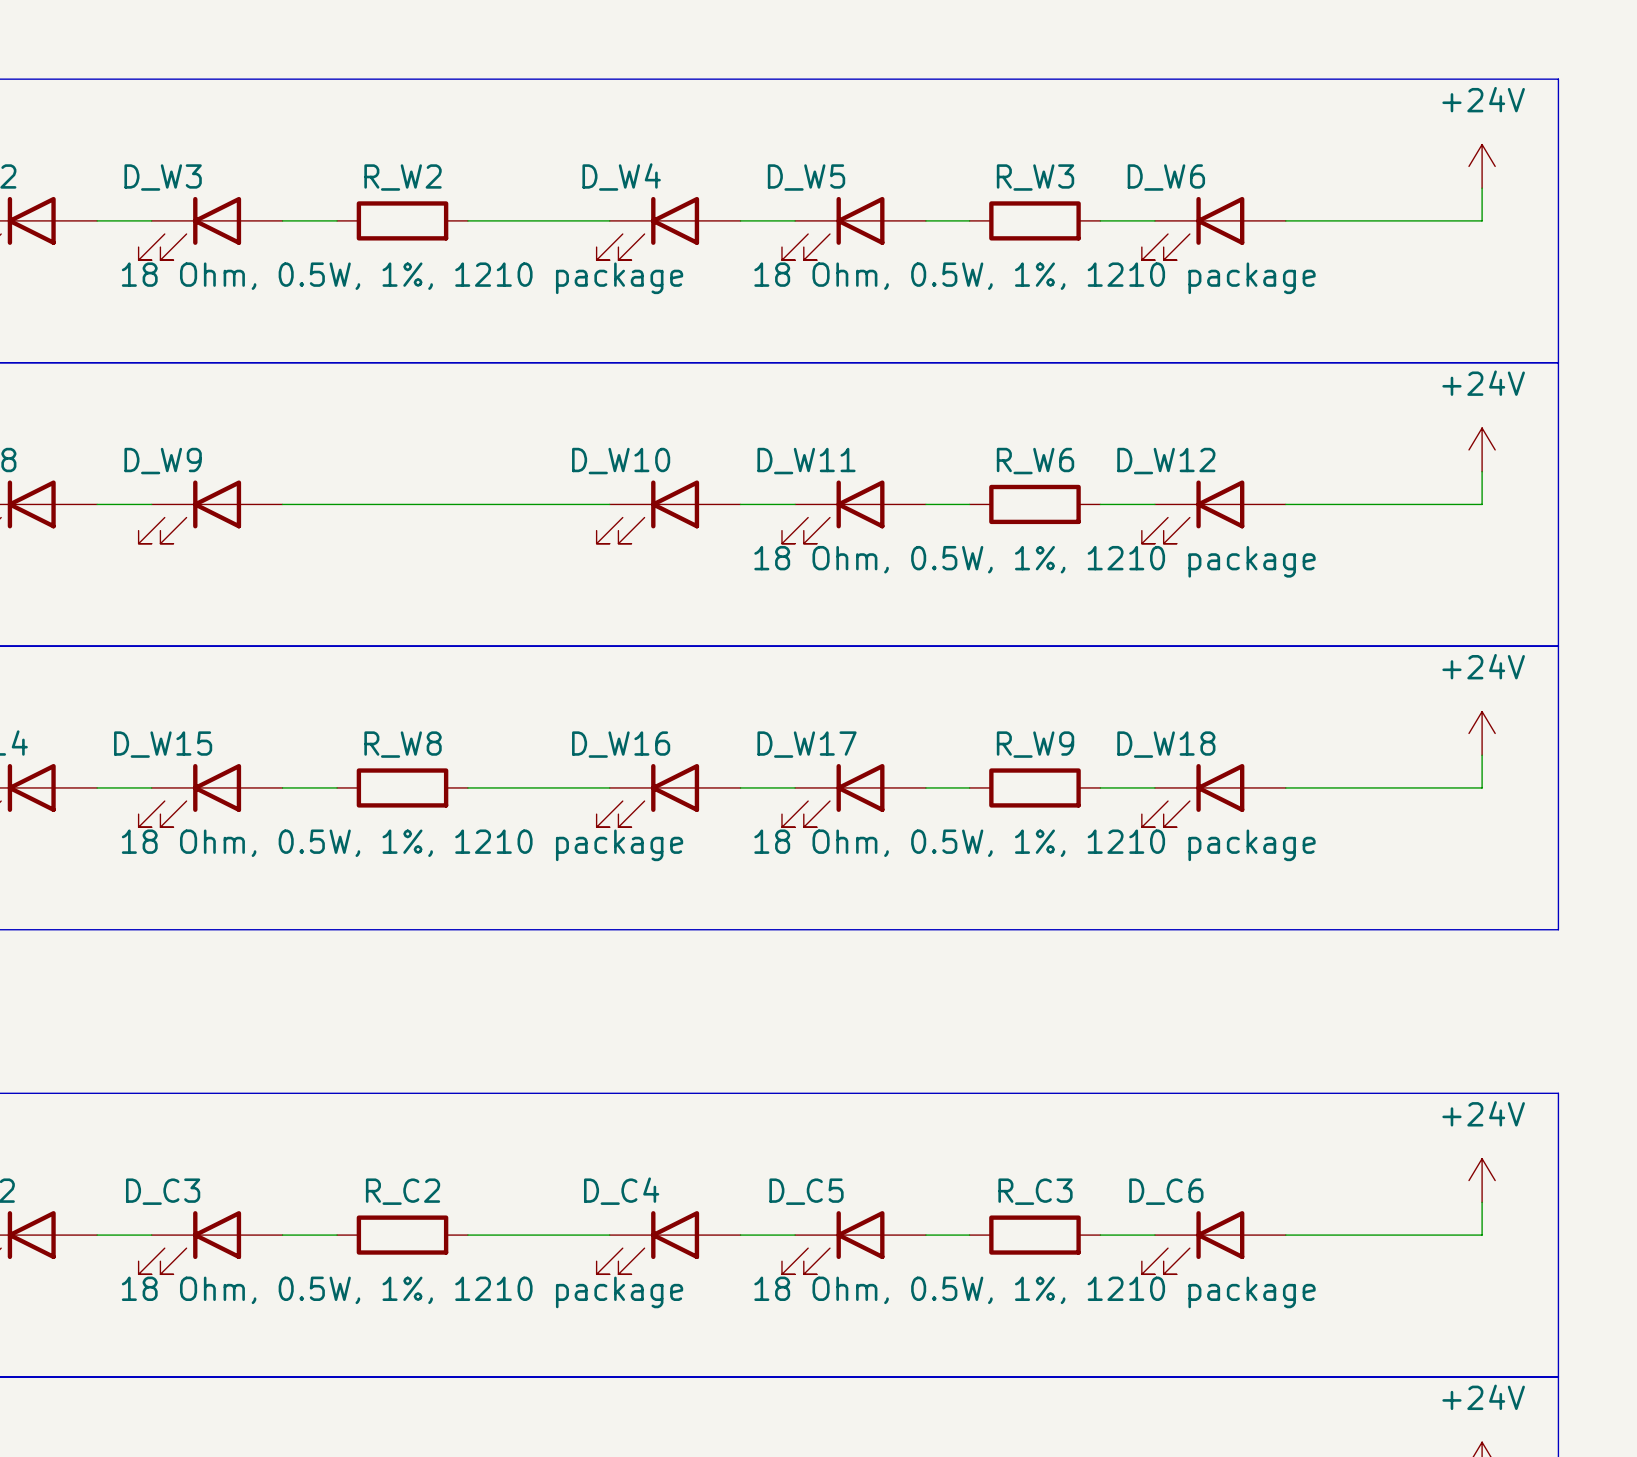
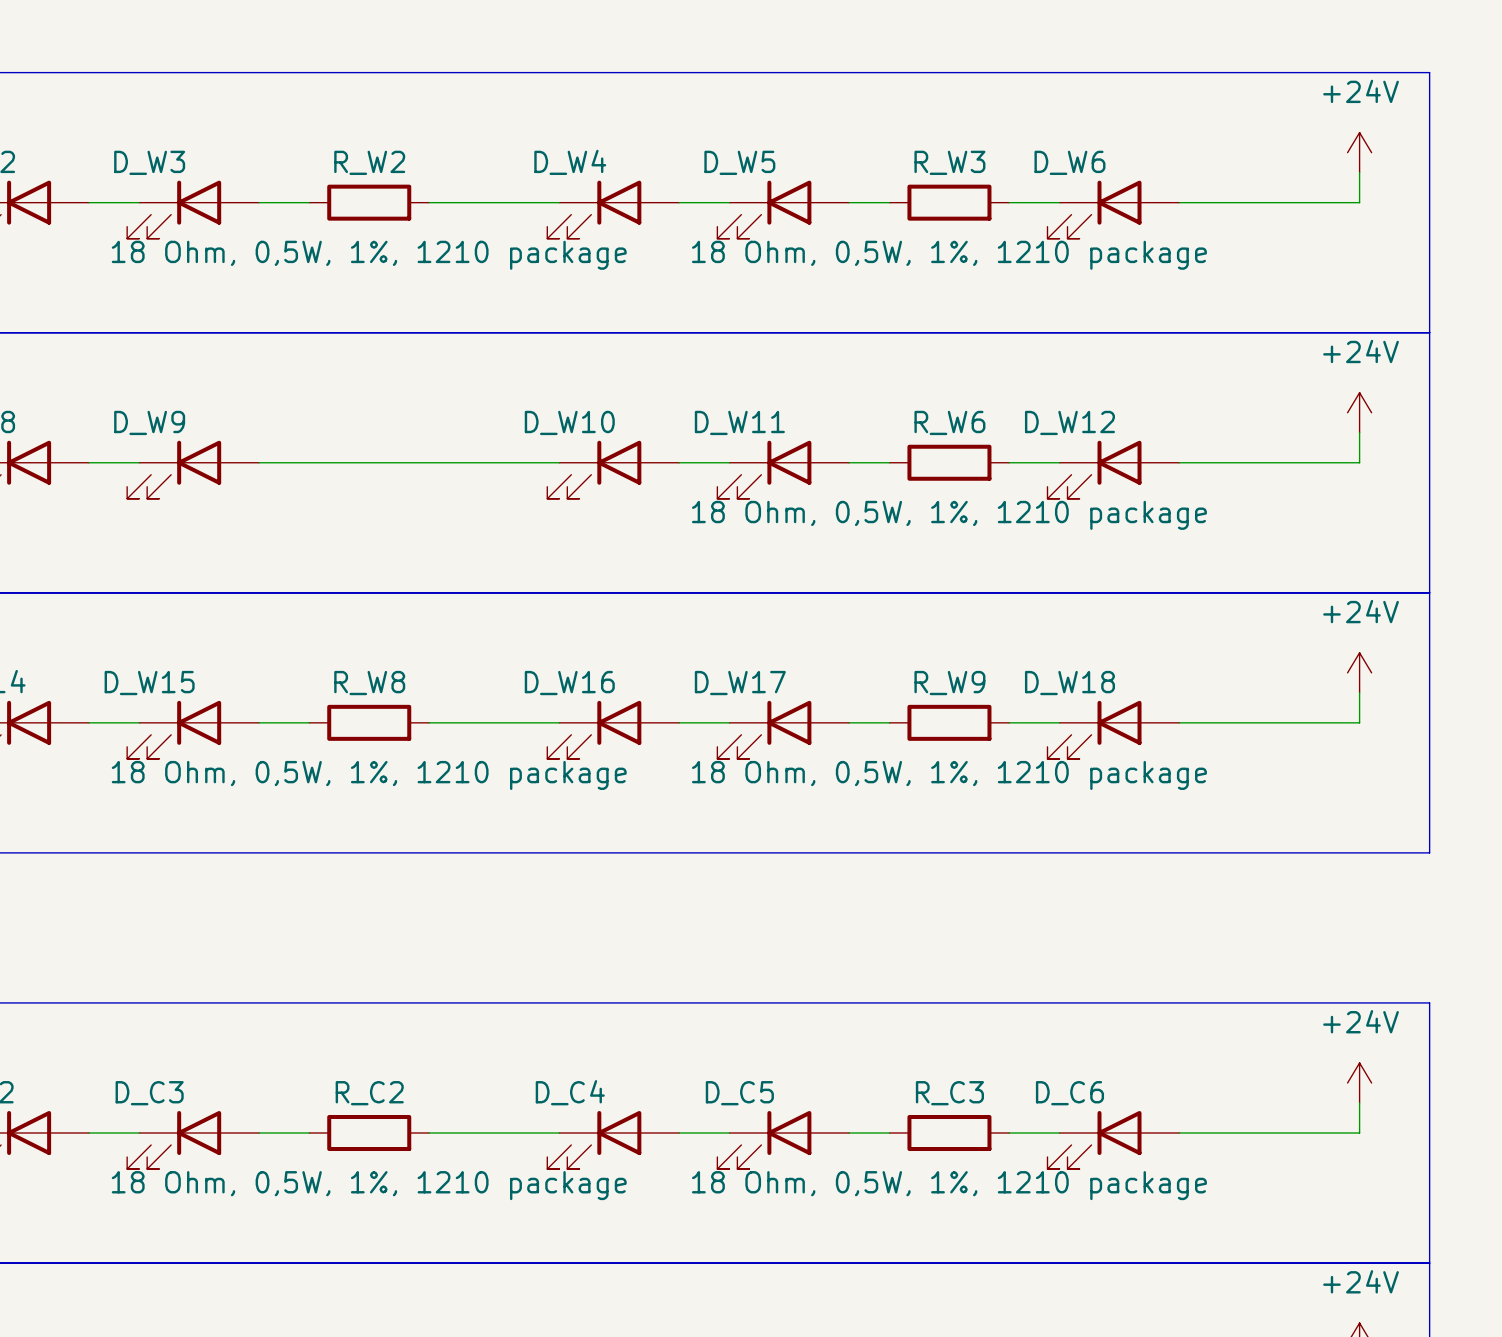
R_W2 value: 18 Ohm, 0.5W, 1%, 1210 package (402, 278) -> 18 Ohm, 0,5W, 1%, 1210 package (369, 255)
R_W3 value: 18 Ohm, 0.5W, 1%, 1210 package (1034, 278) -> 18 Ohm, 0,5W, 1%, 1210 package (949, 255)
R_W6 value: 18 Ohm, 0.5W, 1%, 1210 package (1034, 561) -> 18 Ohm, 0,5W, 1%, 1210 package (949, 515)
R_W8 value: 18 Ohm, 0.5W, 1%, 1210 package (402, 845) -> 18 Ohm, 0,5W, 1%, 1210 package (369, 775)
R_W9 value: 18 Ohm, 0.5W, 1%, 1210 package (1034, 845) -> 18 Ohm, 0,5W, 1%, 1210 package (949, 775)
R_C2 value: 18 Ohm, 0.5W, 1%, 1210 package (402, 1292) -> 18 Ohm, 0,5W, 1%, 1210 package (369, 1185)
R_C3 value: 18 Ohm, 0.5W, 1%, 1210 package (1034, 1292) -> 18 Ohm, 0,5W, 1%, 1210 package (949, 1185)

